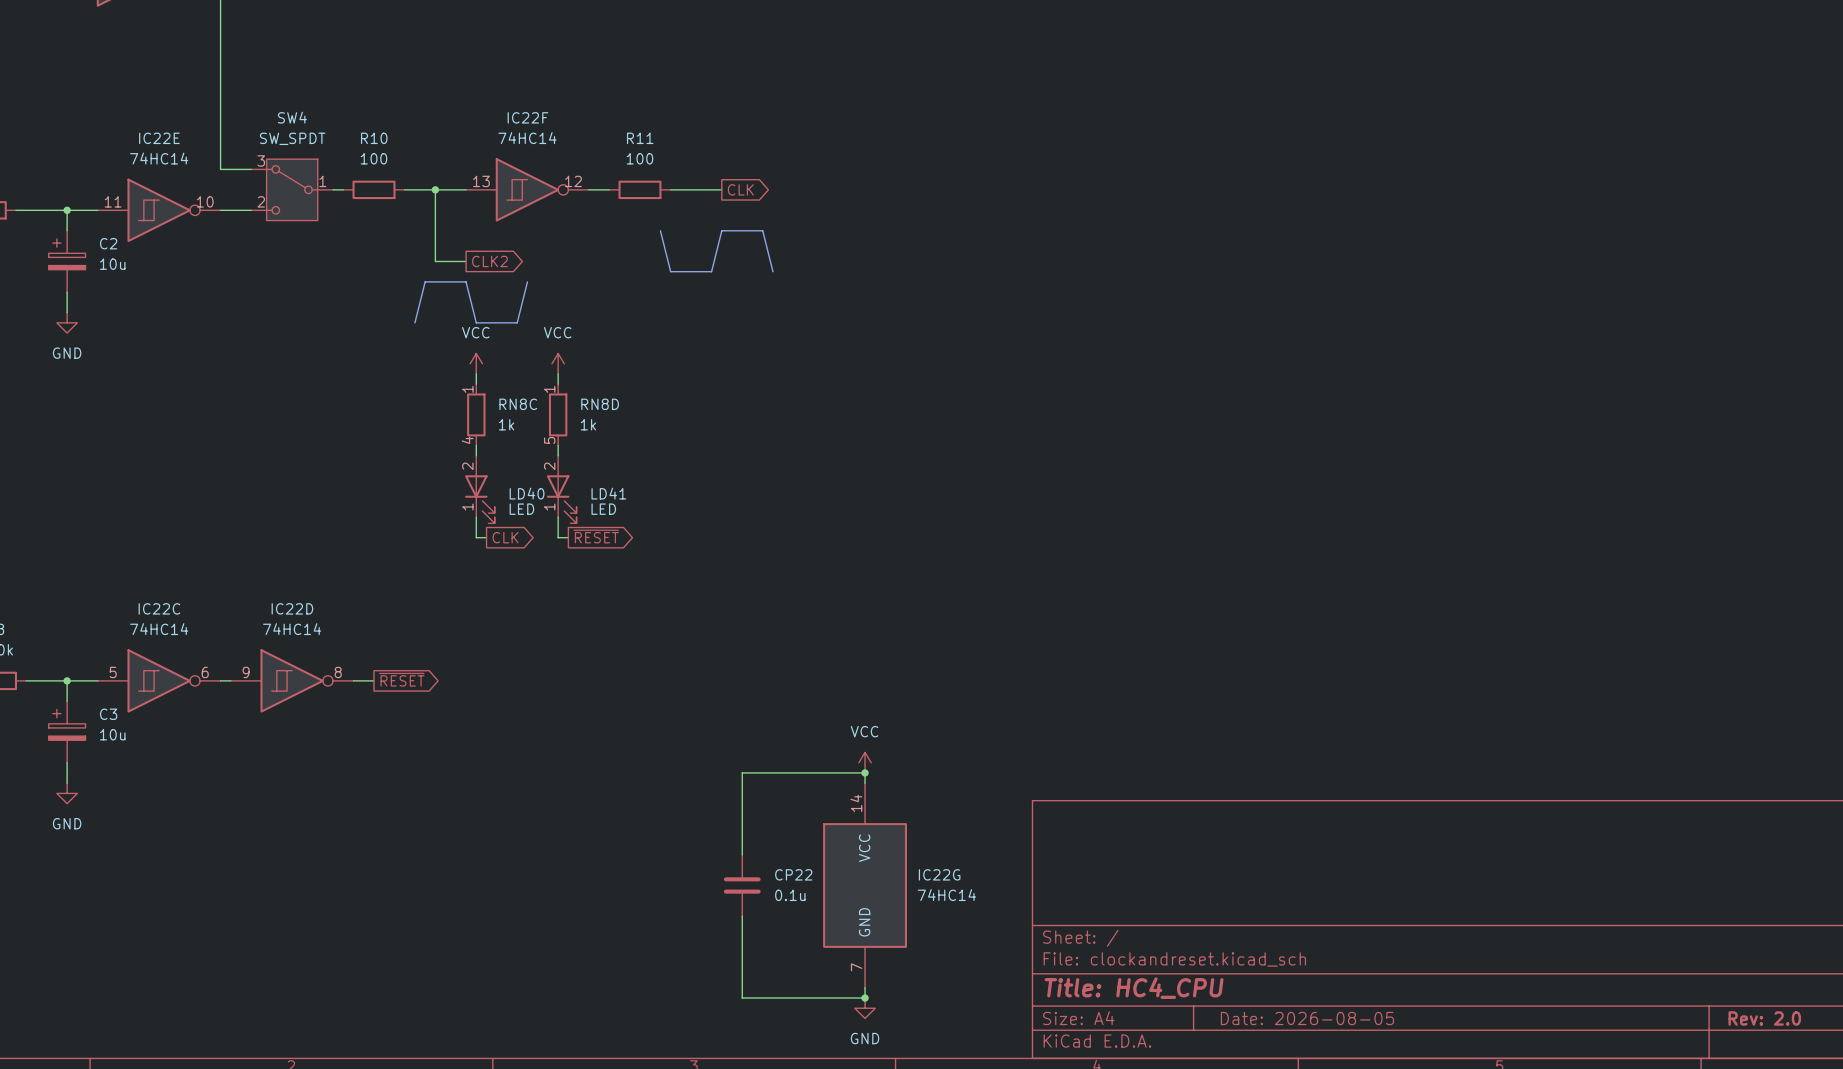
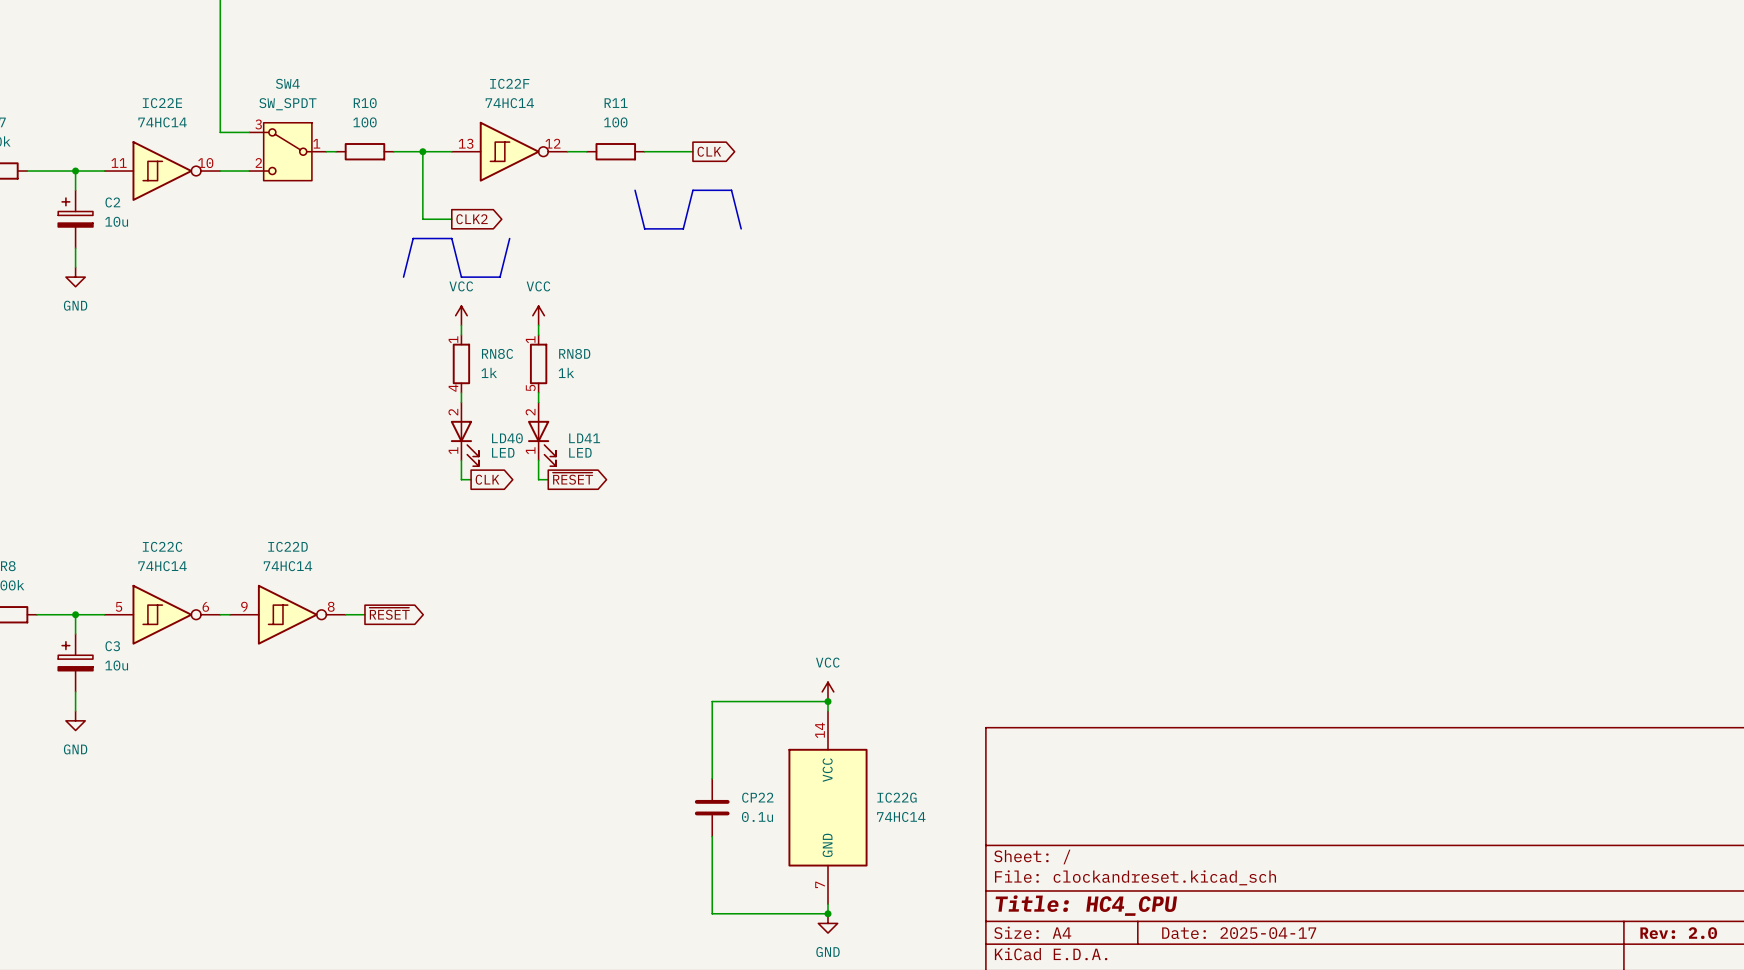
title block: Date: 2026-08-05 (1307, 1018) -> Date: 2025-04-17 (1239, 933)

